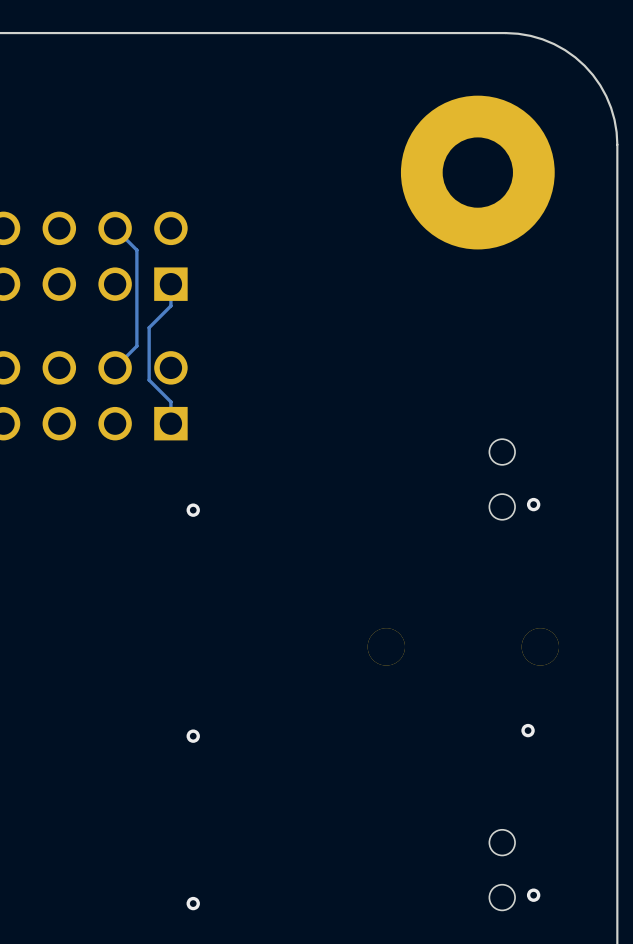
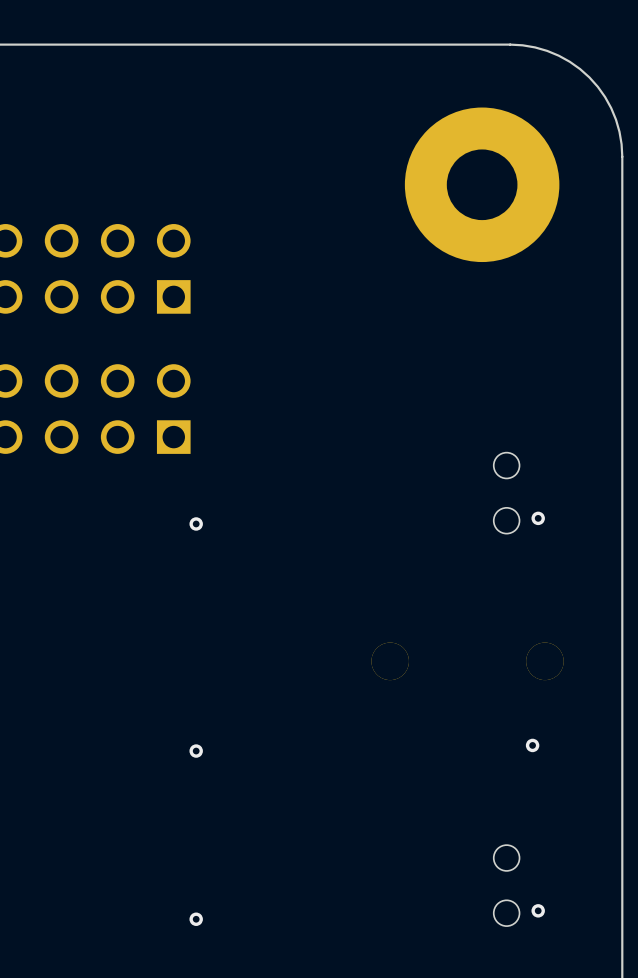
track: (115, 228) (136, 250) (136, 346) (115, 367) -> none
track: (170, 284) (170, 305) (149, 327) (149, 380) (170, 401) (170, 423) -> none

